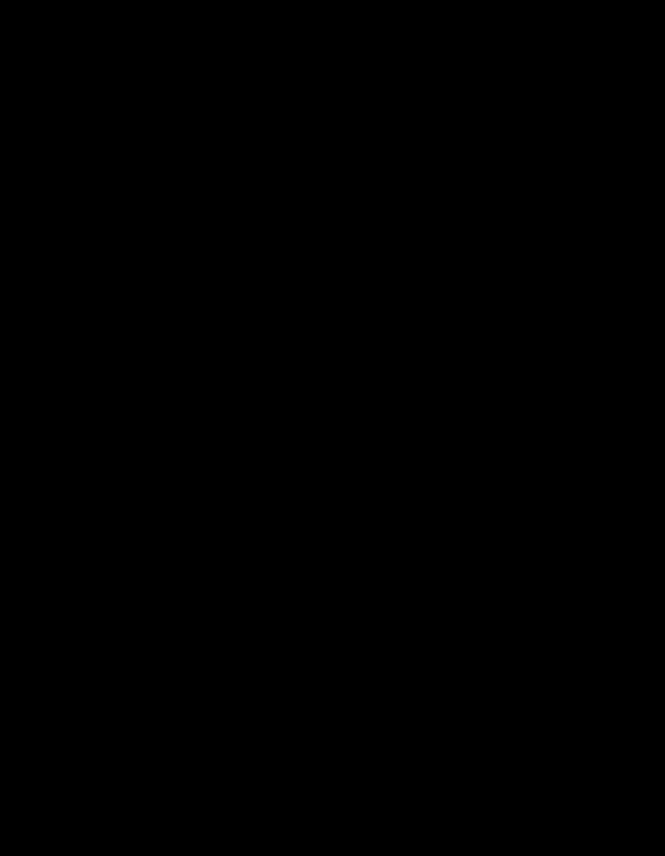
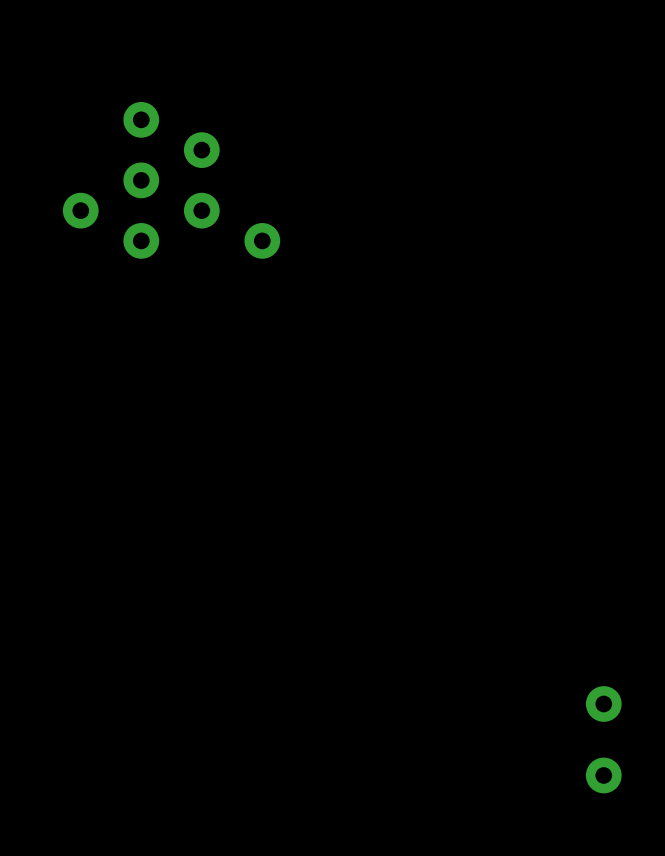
part: none -> (141, 119)
part: none -> (201, 150)
part: none -> (141, 180)
part: none -> (80, 210)
part: none -> (201, 210)
part: none -> (141, 240)
part: none -> (262, 240)
part: none -> (603, 703)
part: none -> (603, 775)

